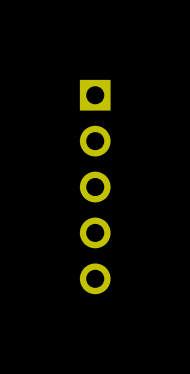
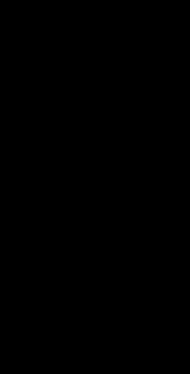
part: (95, 187) -> none

